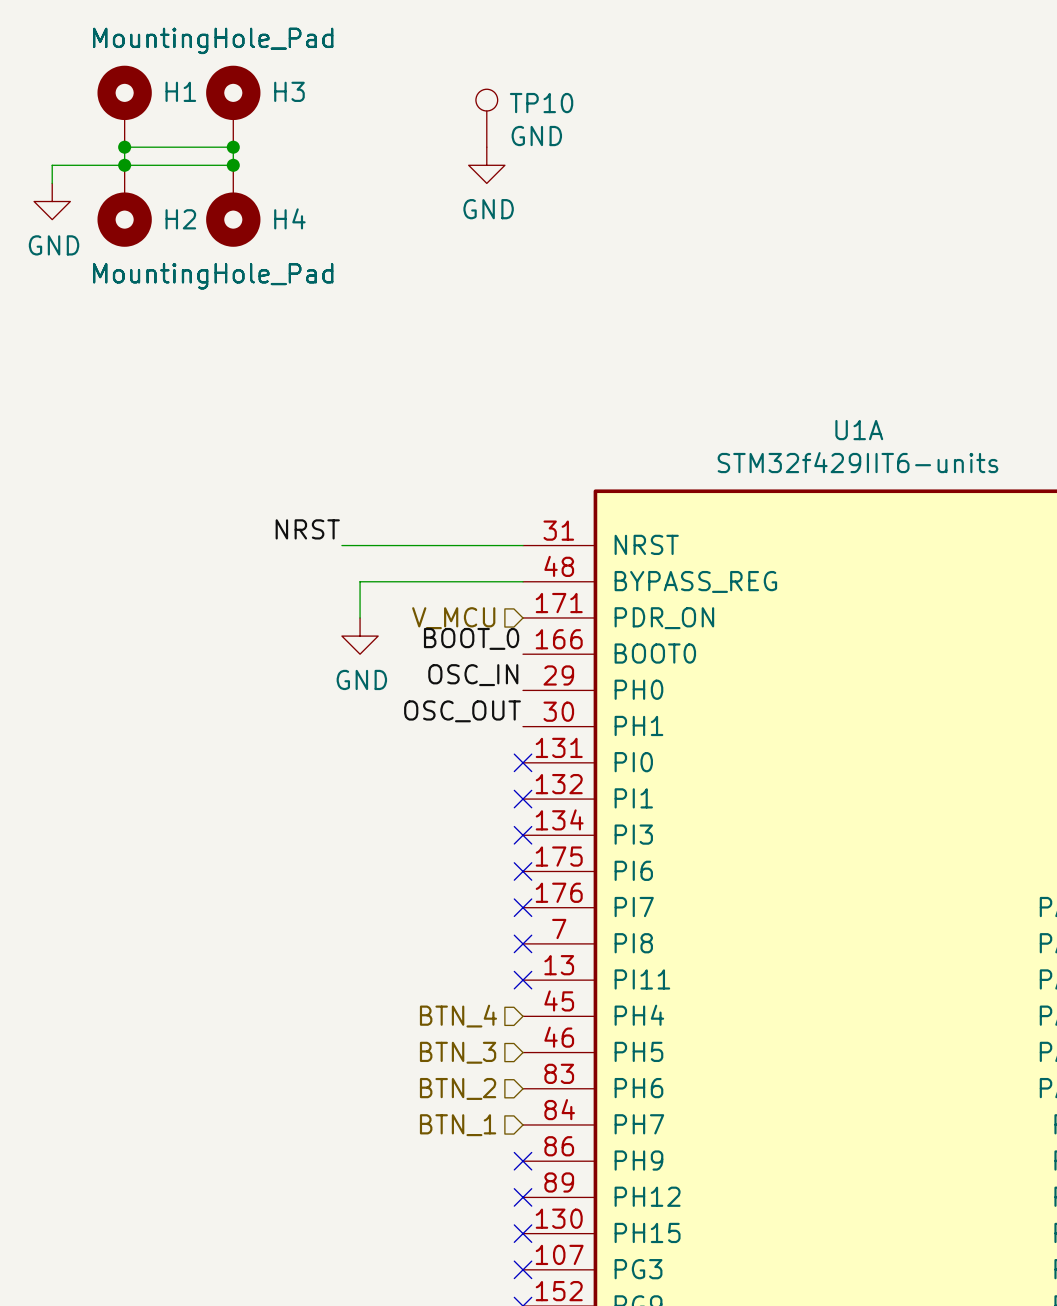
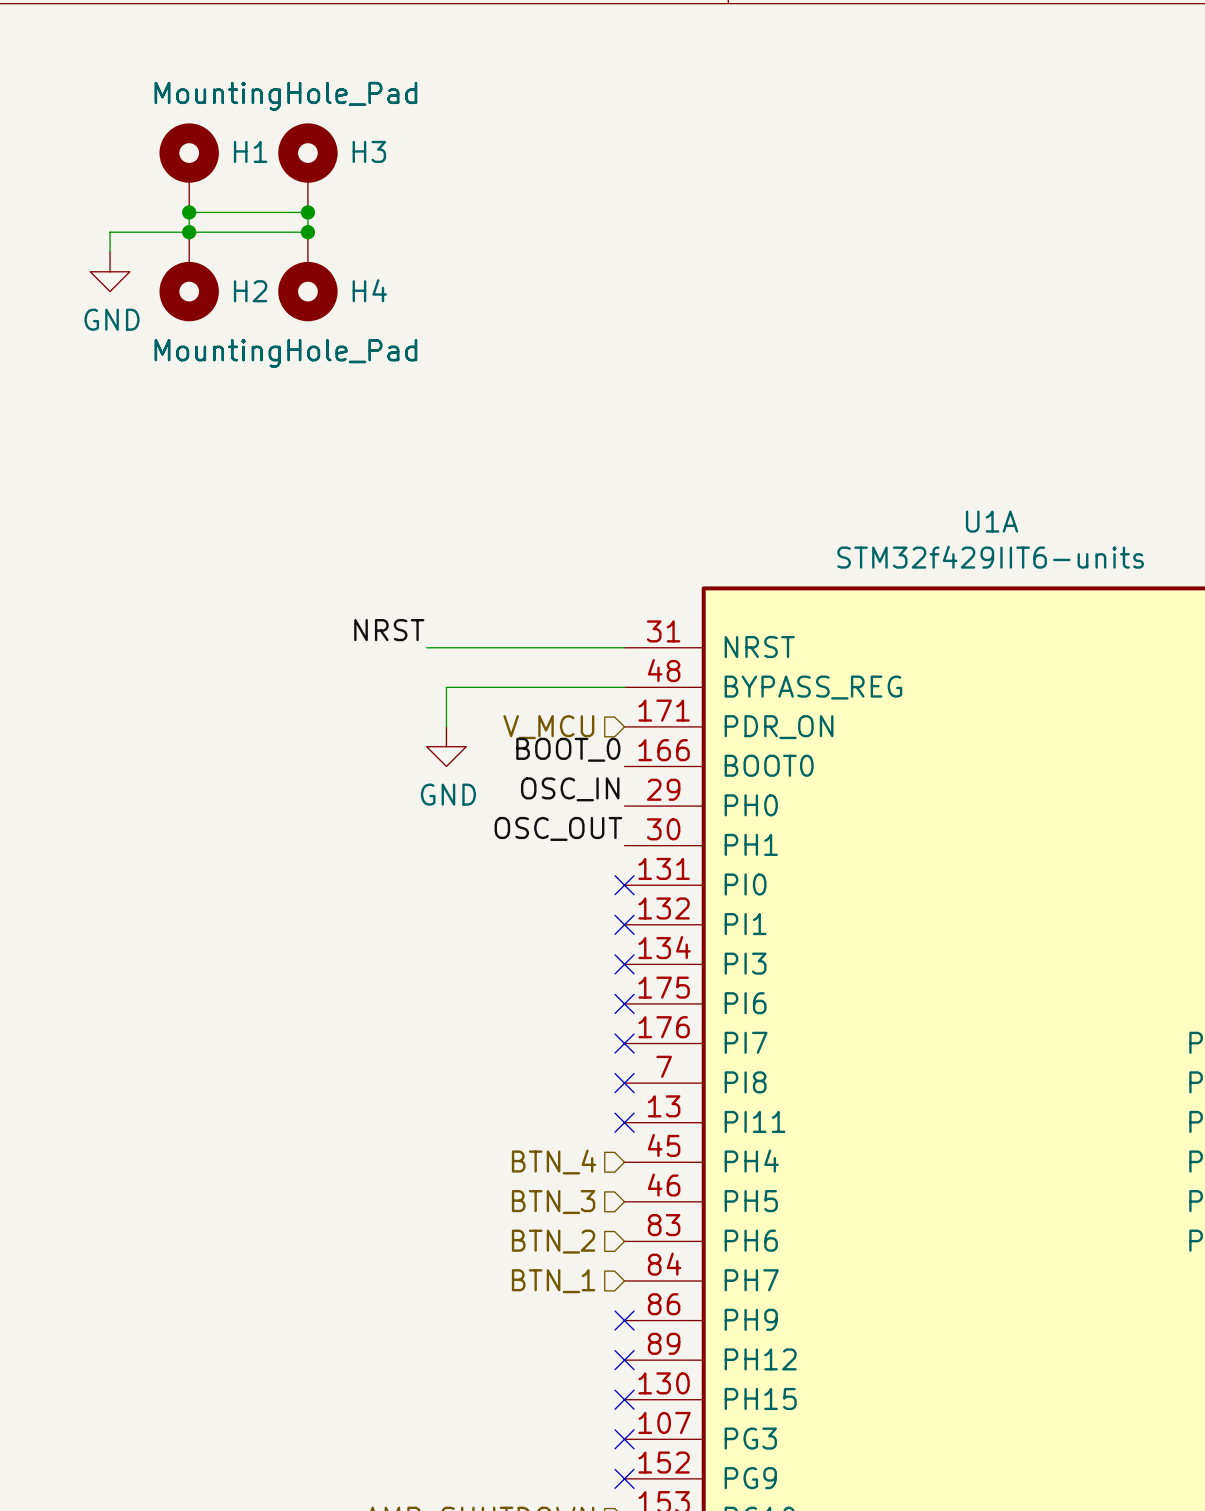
TP10: GND (486, 118) -> none
power symbol: GND (486, 165) -> none

